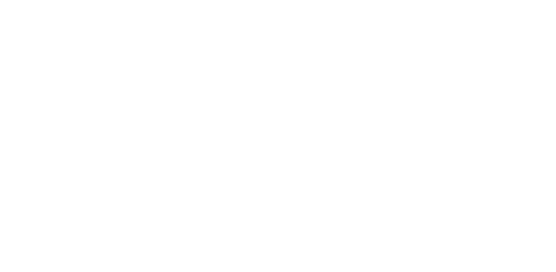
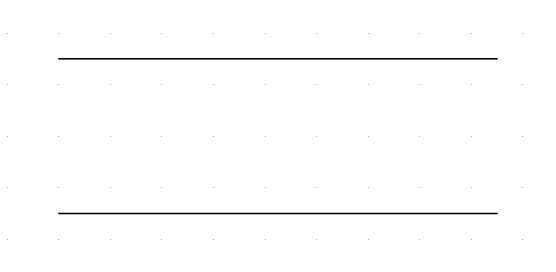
wire: none -> (58, 58) (497, 58)
wire: none -> (58, 213) (497, 213)

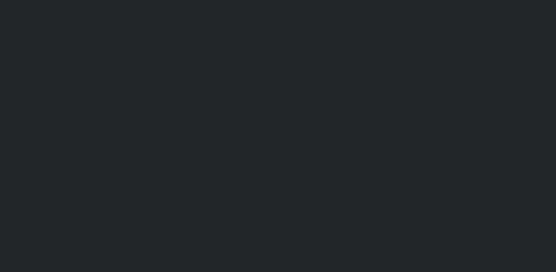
wire: (58, 58) (497, 58) -> none
wire: (58, 213) (497, 213) -> none

